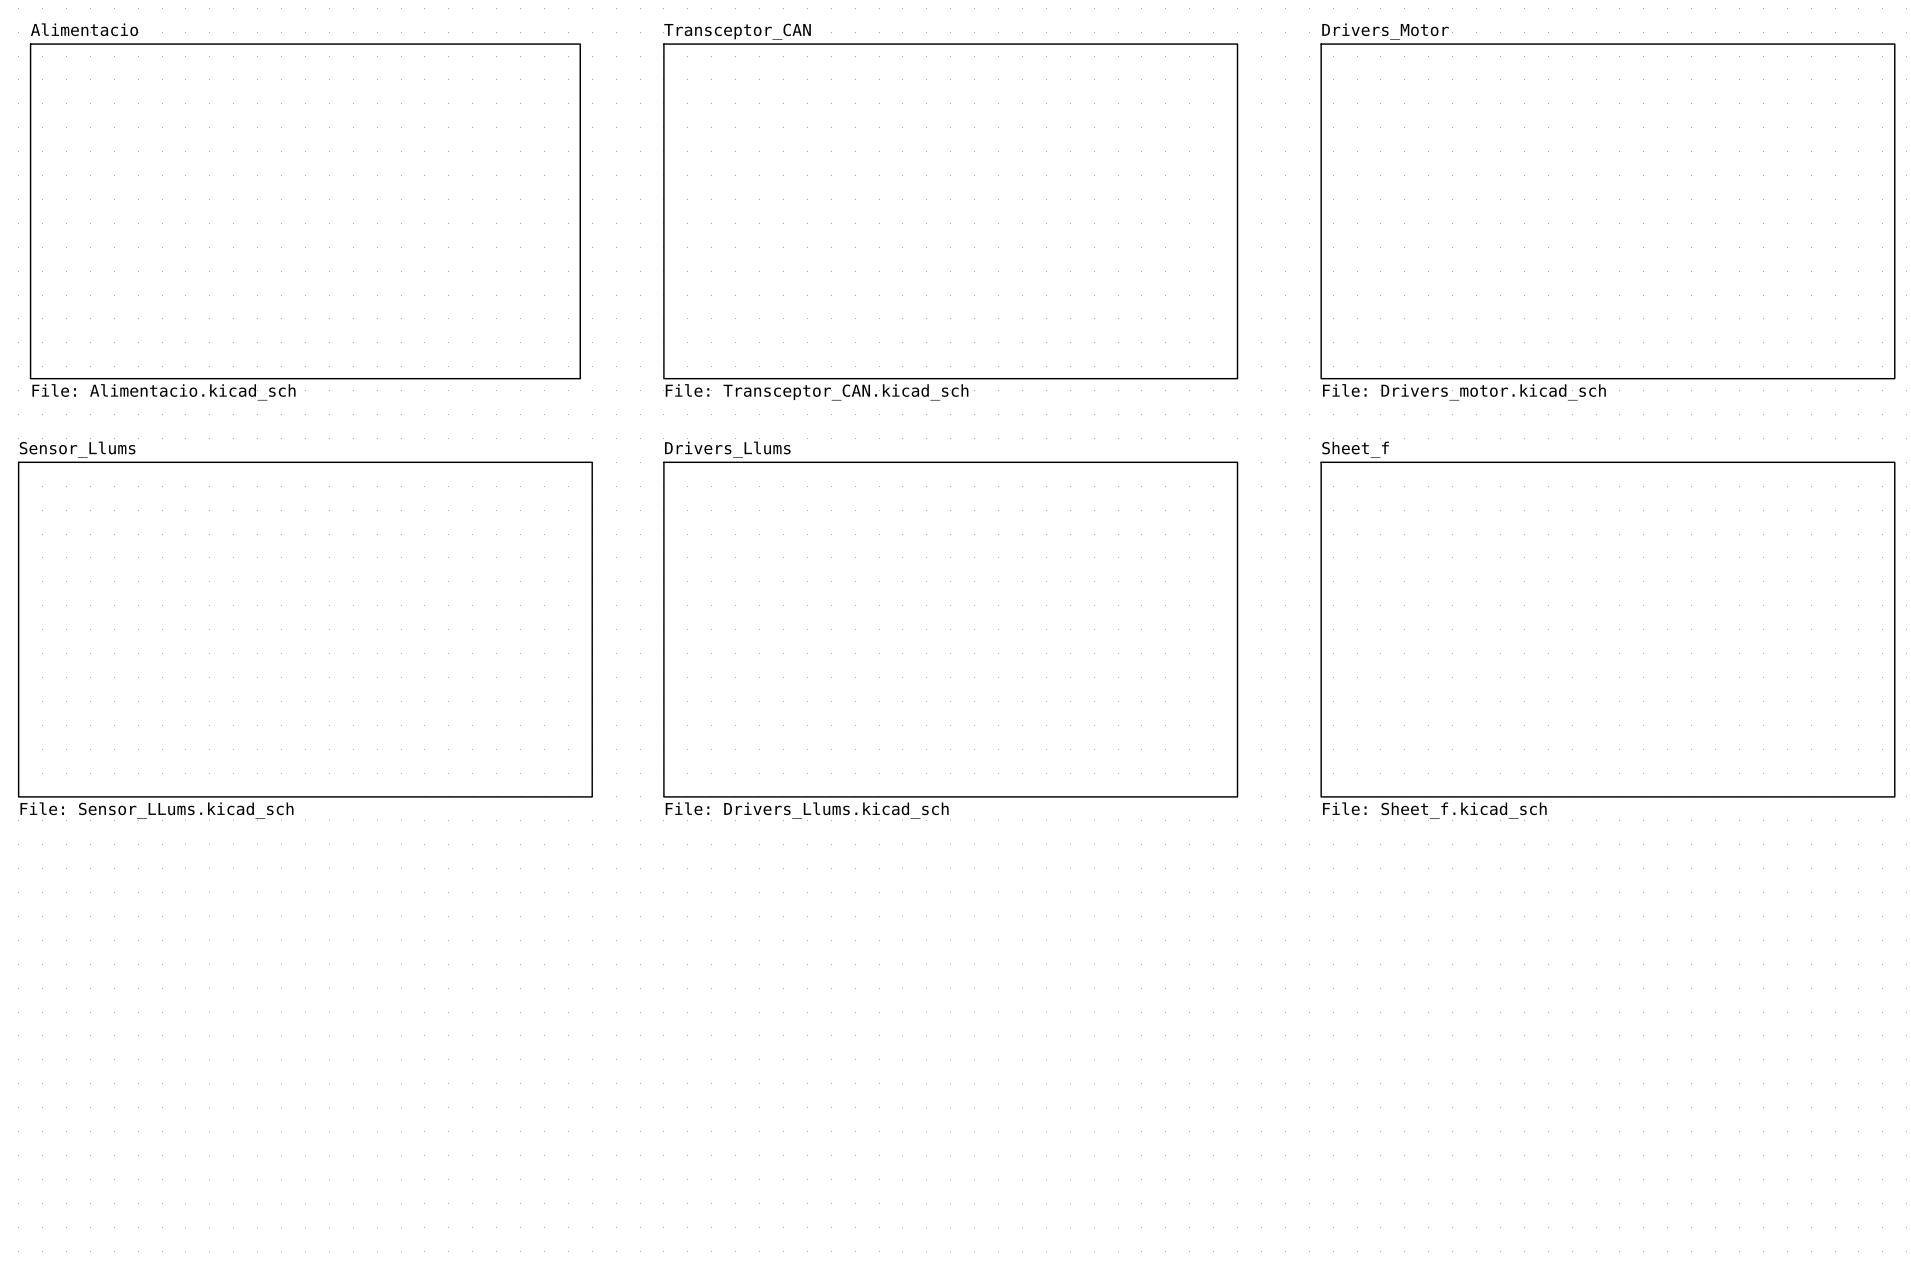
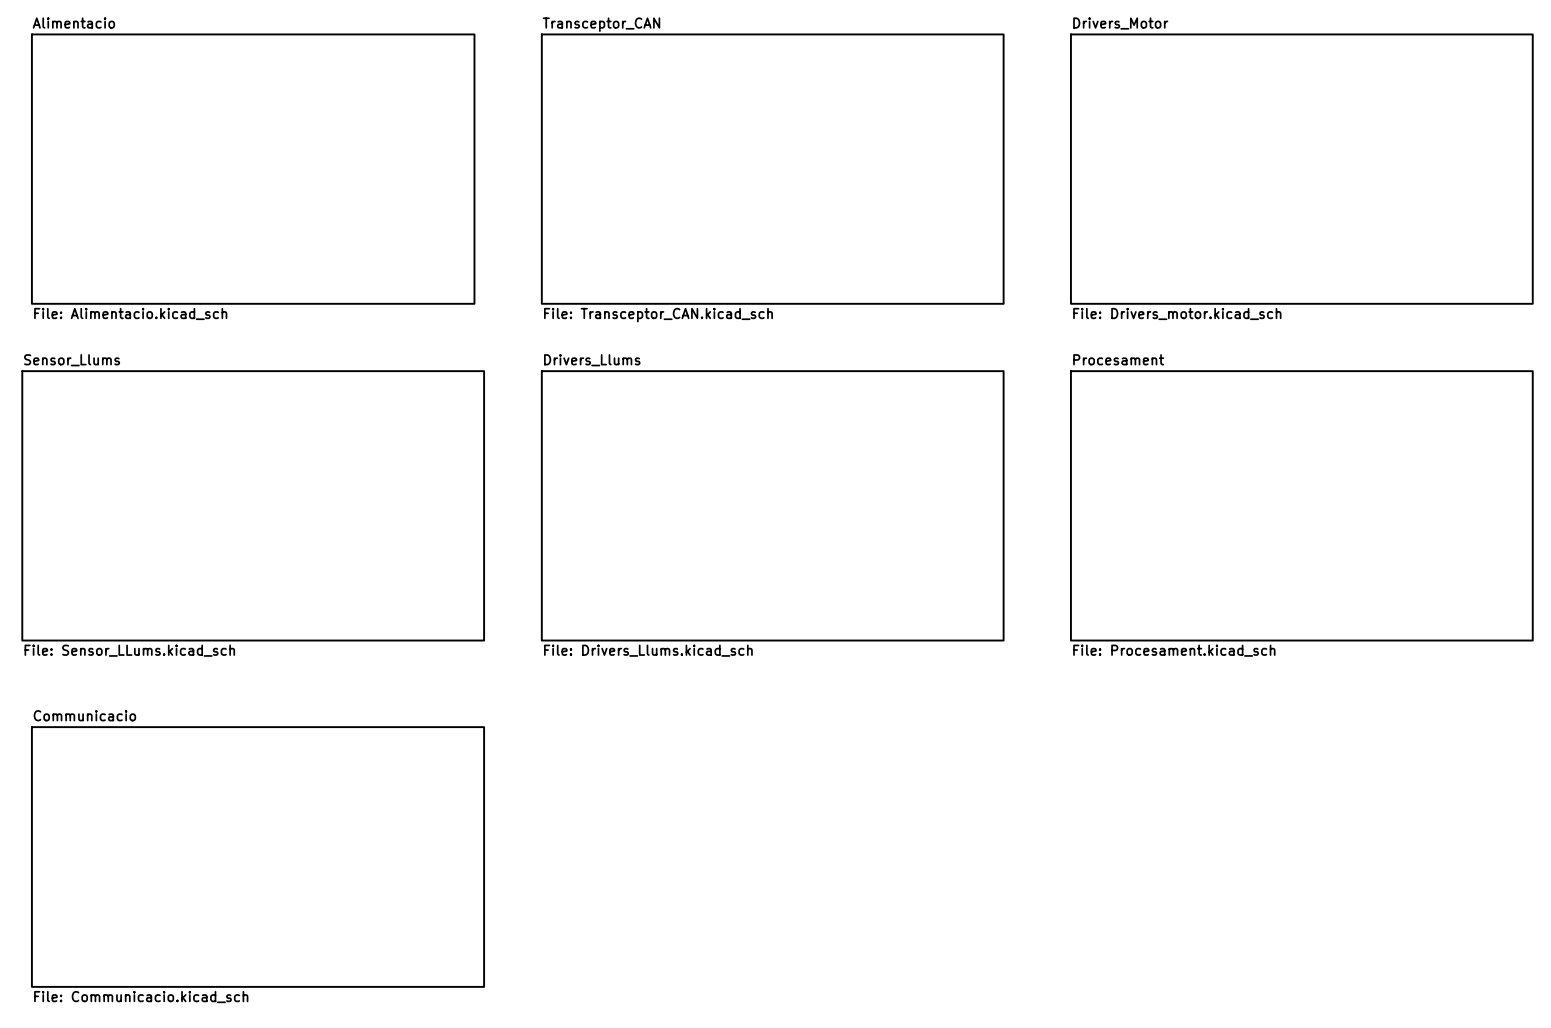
sheet Sheet_f name: Sheet_f (1355, 449) -> Procesament (1118, 359)
sheet Sheet_f value: File: Sheet_f.kicad_sch (1434, 810) -> File: Procesament.kicad_sch (1174, 650)
sheet Communicacio: none -> File: Communicacio.kicad_sch (258, 857)

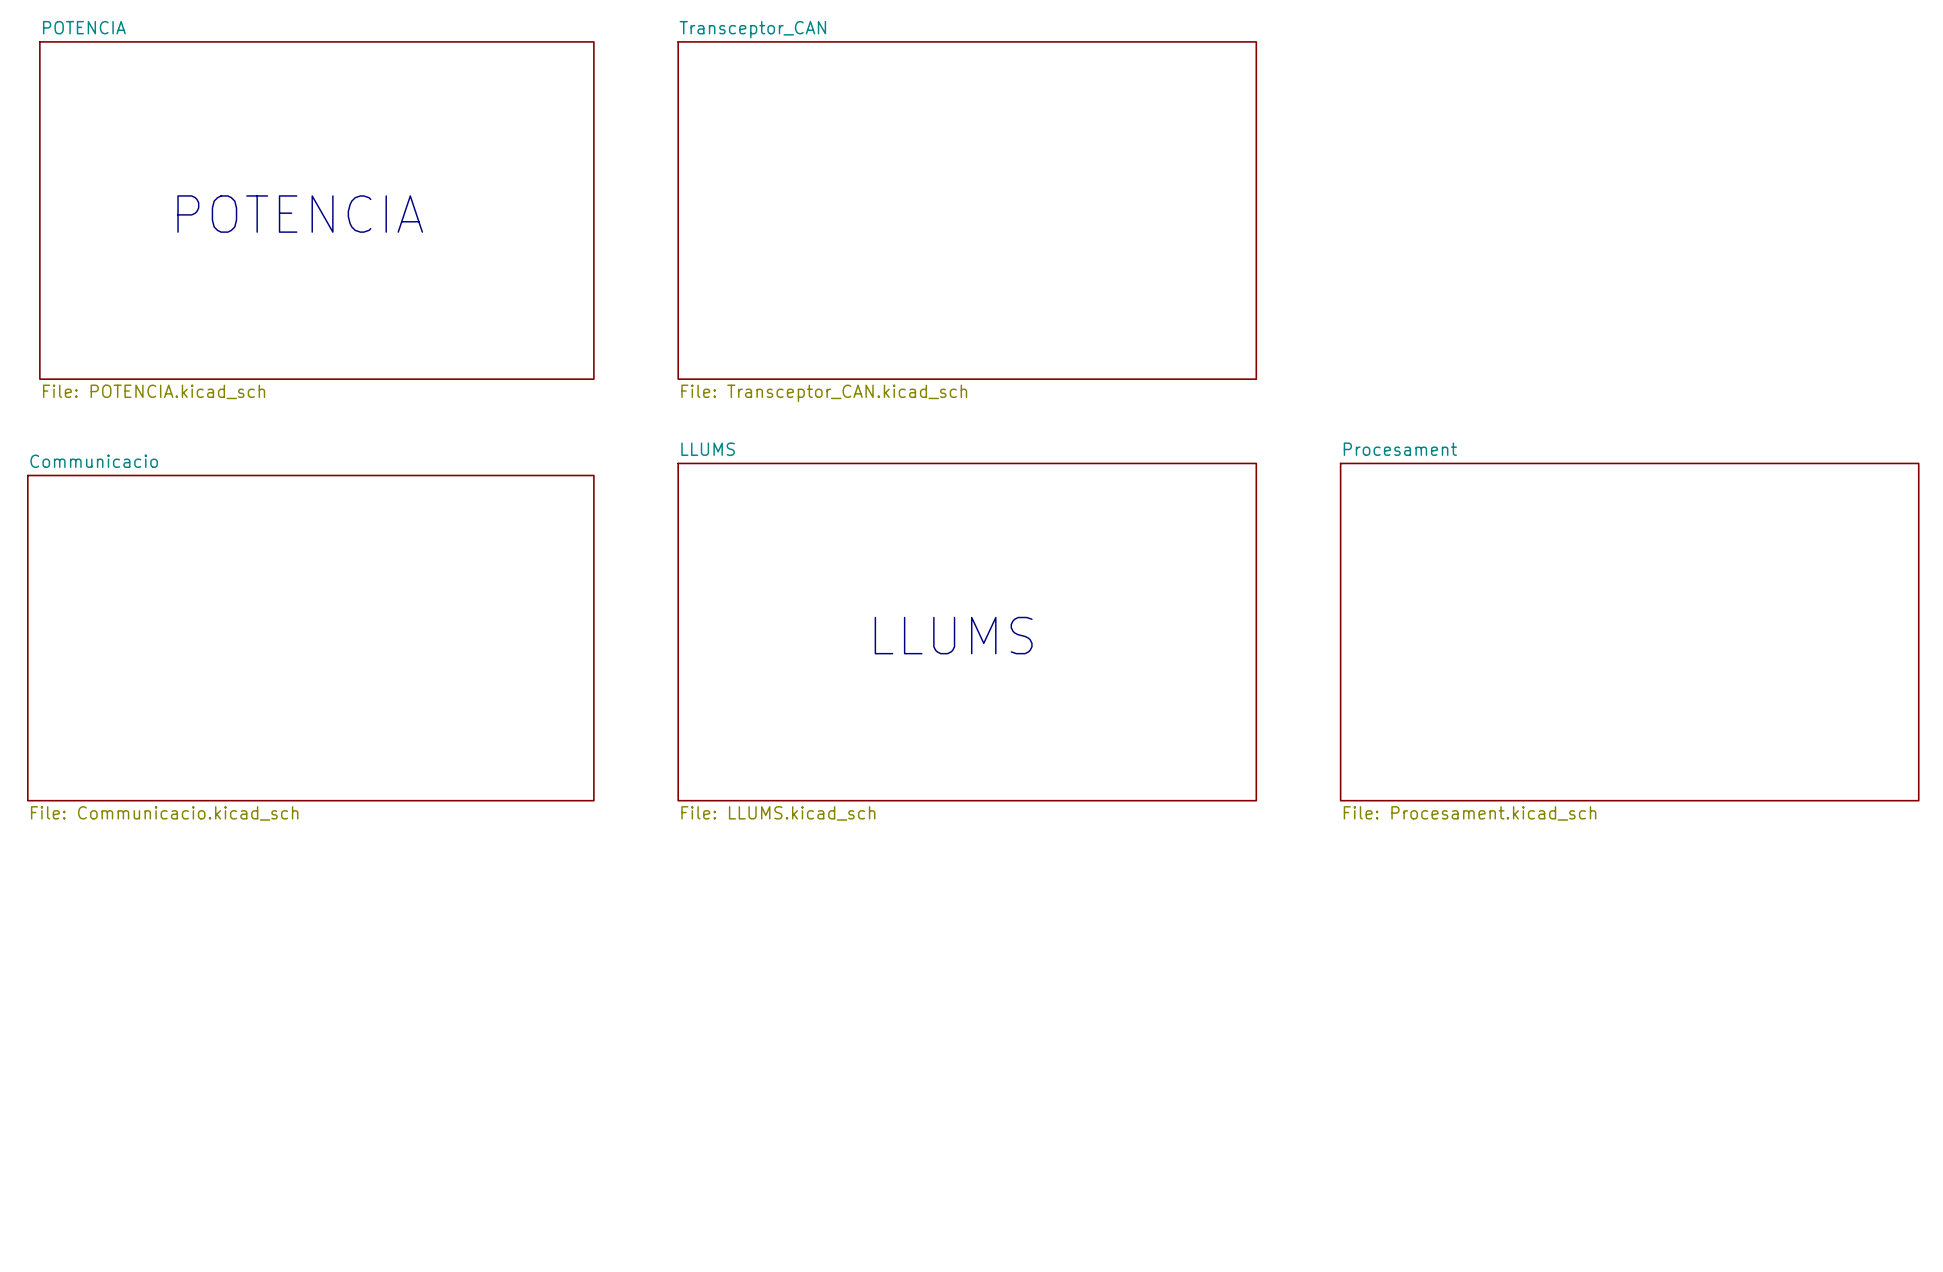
sheet Alimentacio name: Alimentacio (73, 23) -> POTENCIA (84, 27)
sheet Drivers_Motor: File: Drivers_motor.kicad_sch (1301, 169) -> none
text: none -> POTENCIA (300, 214)
sheet Alimentacio value: File: Alimentacio.kicad_sch (130, 313) -> File: POTENCIA.kicad_sch (154, 391)
sheet Drivers_Llums name: Drivers_Llums (592, 360) -> LLUMS (708, 449)
sheet Sensor_Llums: File: Sensor_LLums.kicad_sch (253, 505) -> none
text: none -> LLUMS (953, 635)
sheet Communicacio: none -> File: Communicacio.kicad_sch (310, 638)
sheet Drivers_Llums value: File: Drivers_Llums.kicad_sch (648, 650) -> File: LLUMS.kicad_sch (778, 813)
sheet Communicacio: File: Communicacio.kicad_sch (258, 857) -> none

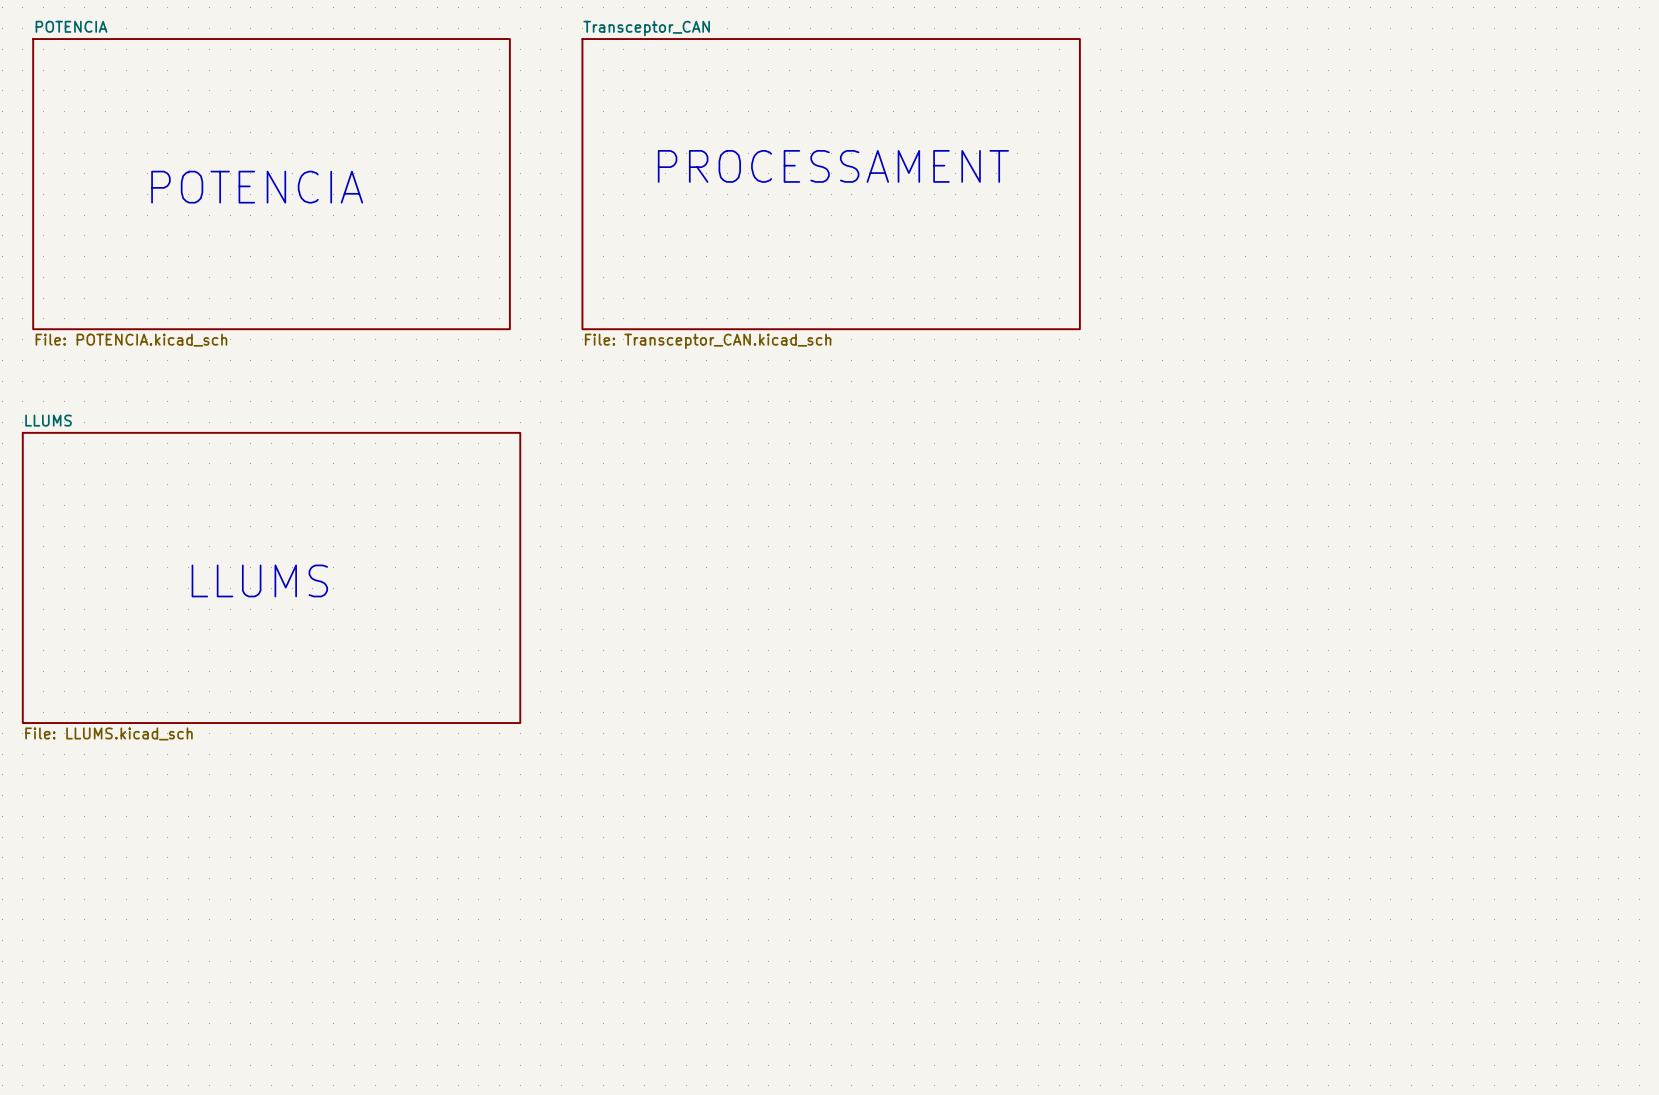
text: none -> PROCESSAMENT (833, 166)
sheet LLUMS: File: LLUMS.kicad_sch (967, 632) -> none
sheet Procesament: File: Procesament.kicad_sch (1629, 632) -> none
text: LLUMS (953, 635) -> none
sheet Communicacio: File: Communicacio.kicad_sch (310, 638) -> none
sheet LLUMS: none -> File: LLUMS.kicad_sch (271, 577)
text: none -> LLUMS (259, 580)

